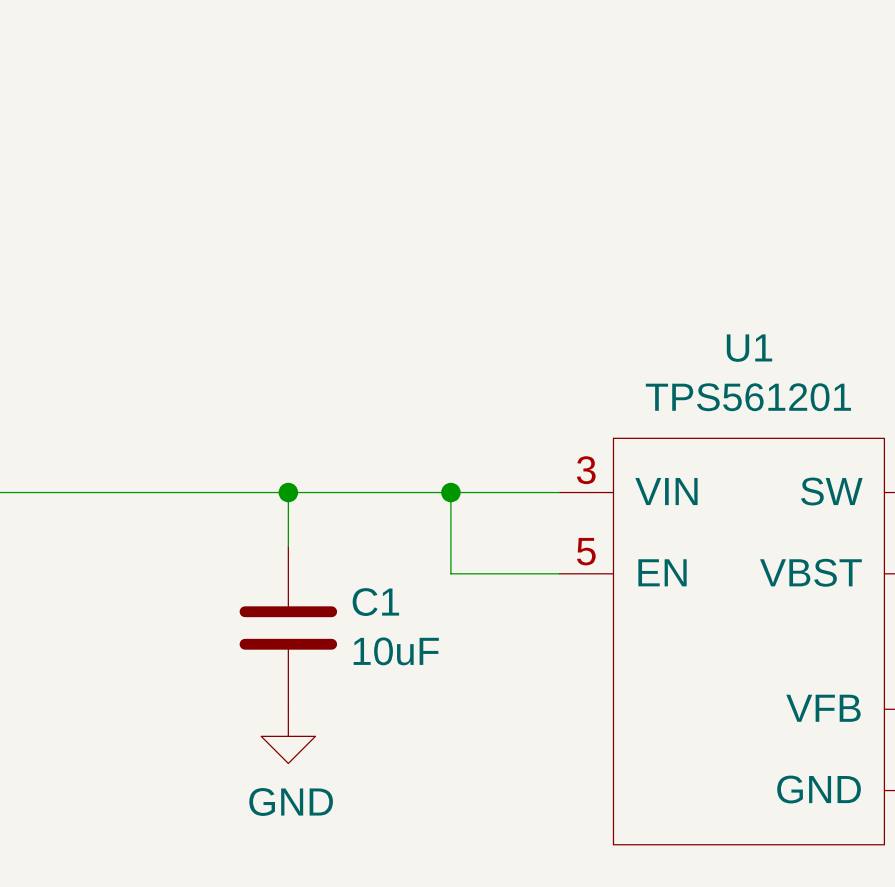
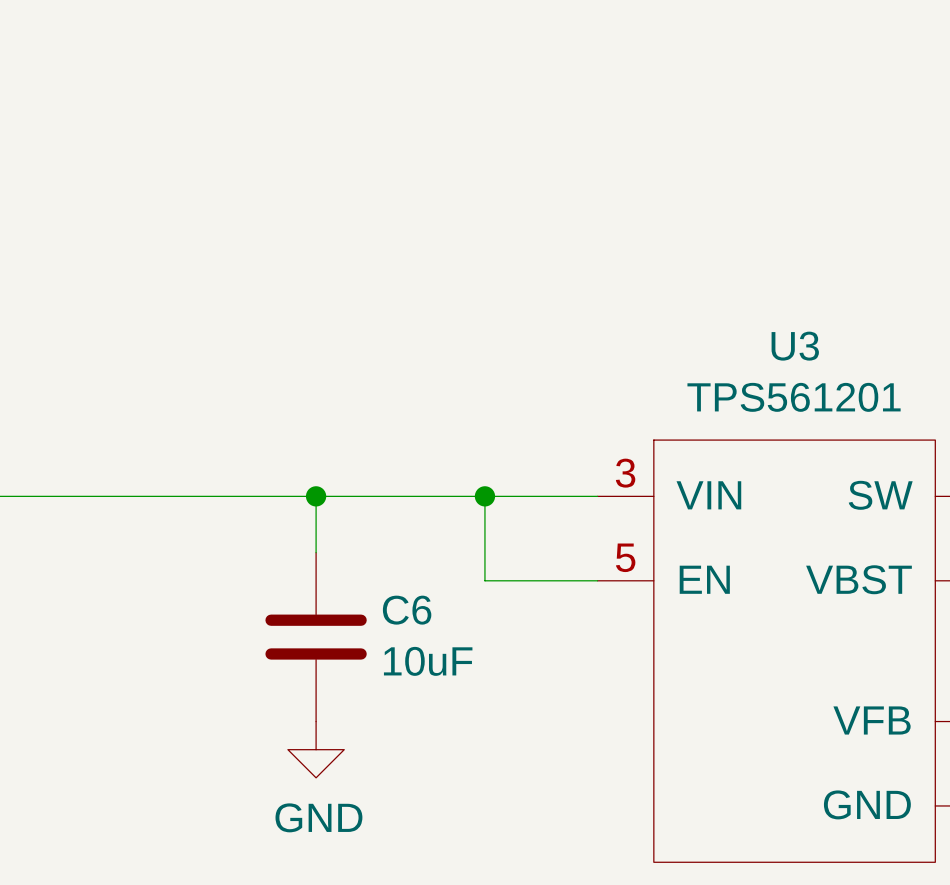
U1 name: U1 (749, 348) -> U3 (795, 346)
C1 name: C1 (375, 602) -> C6 (407, 610)

